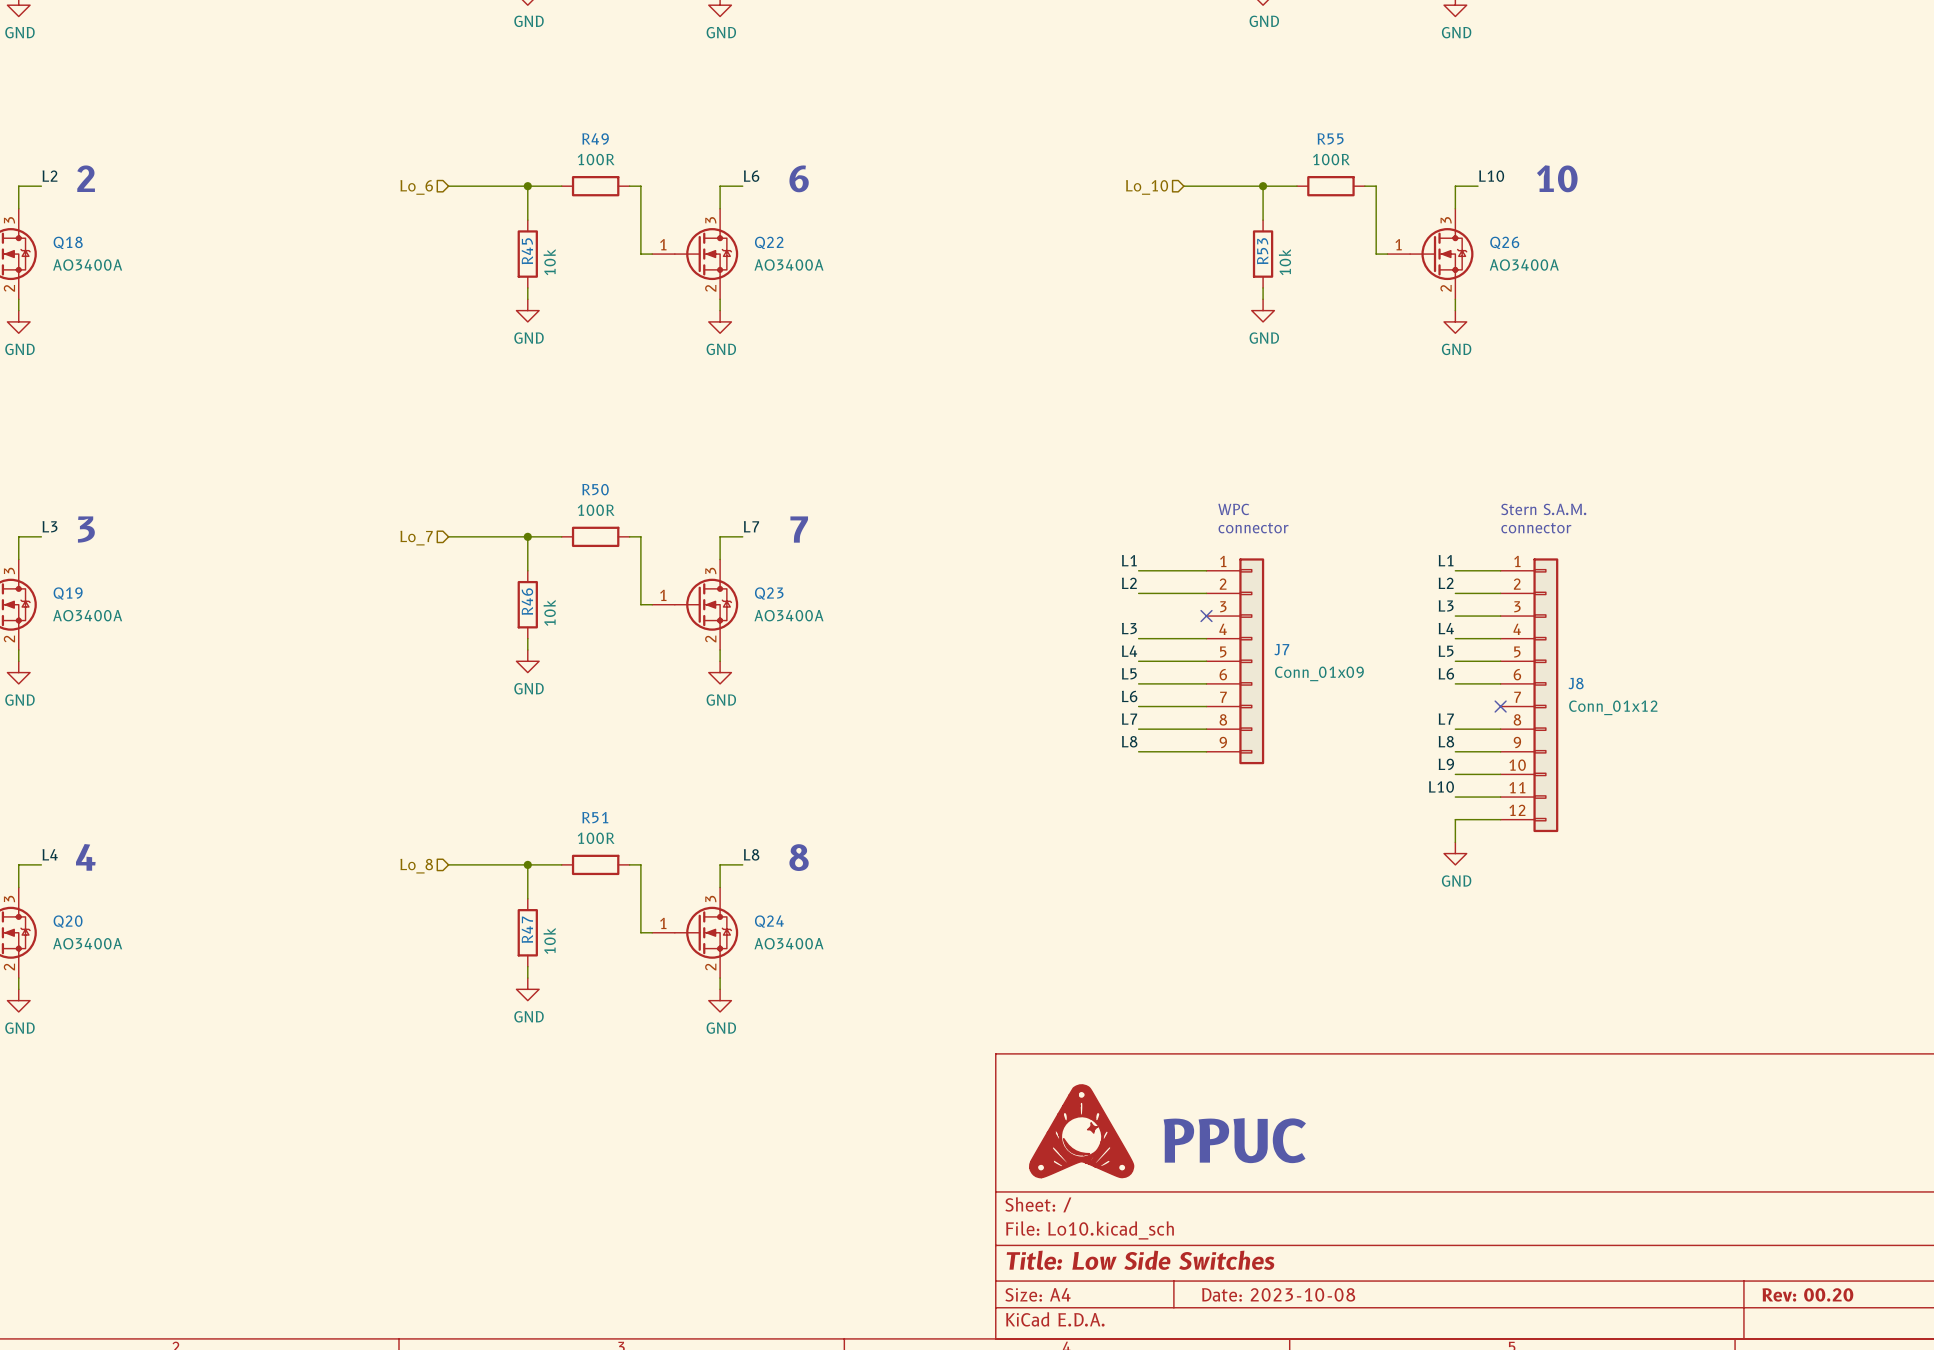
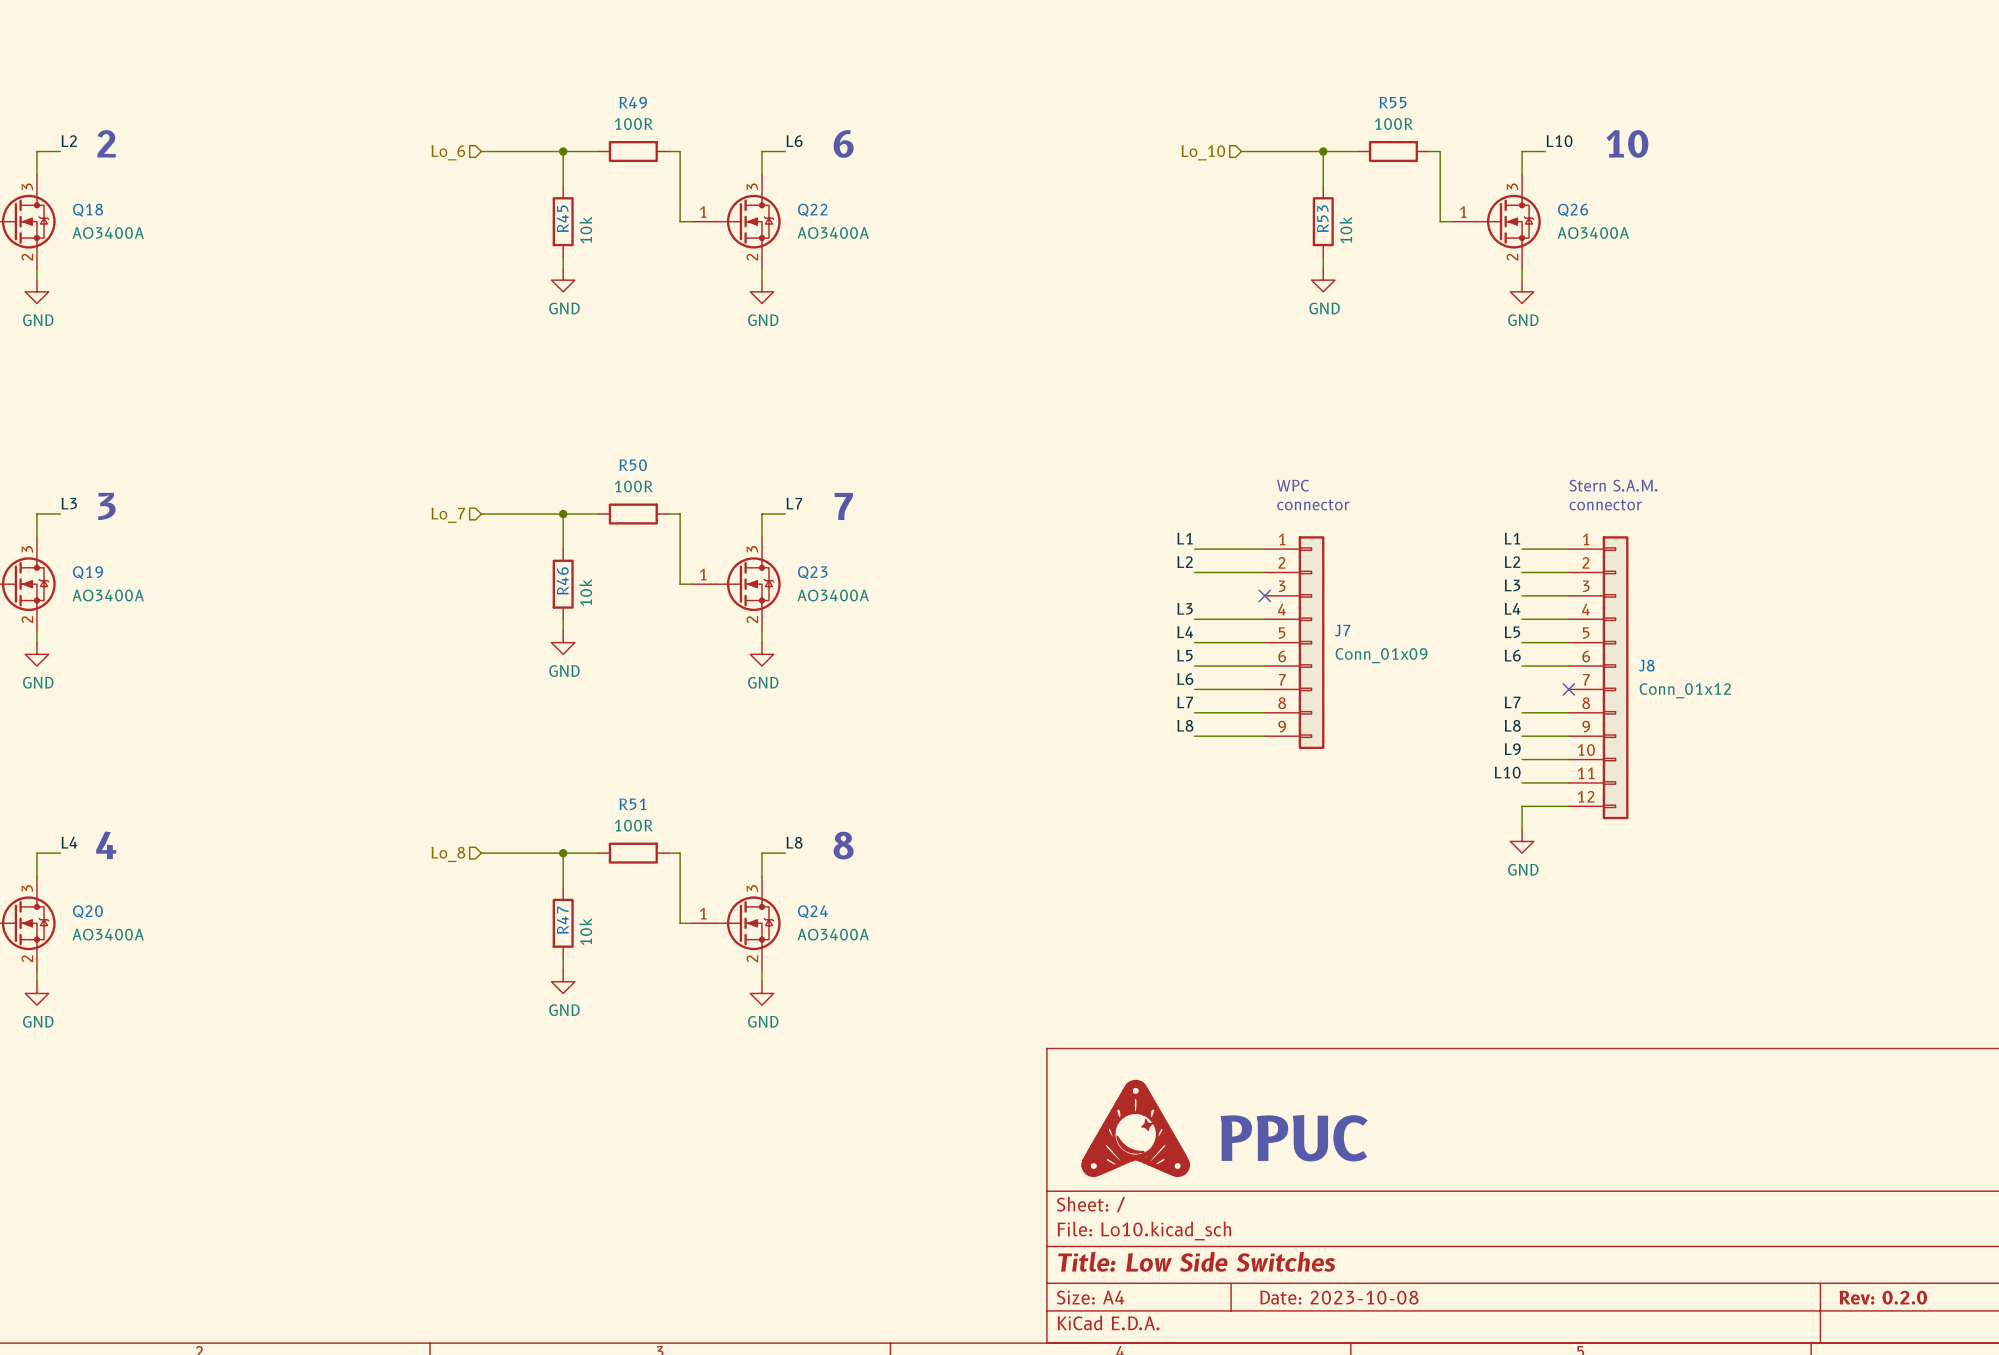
title block: Rev: 00.20 (1807, 1294) -> Rev: 0.2.0 (1883, 1297)

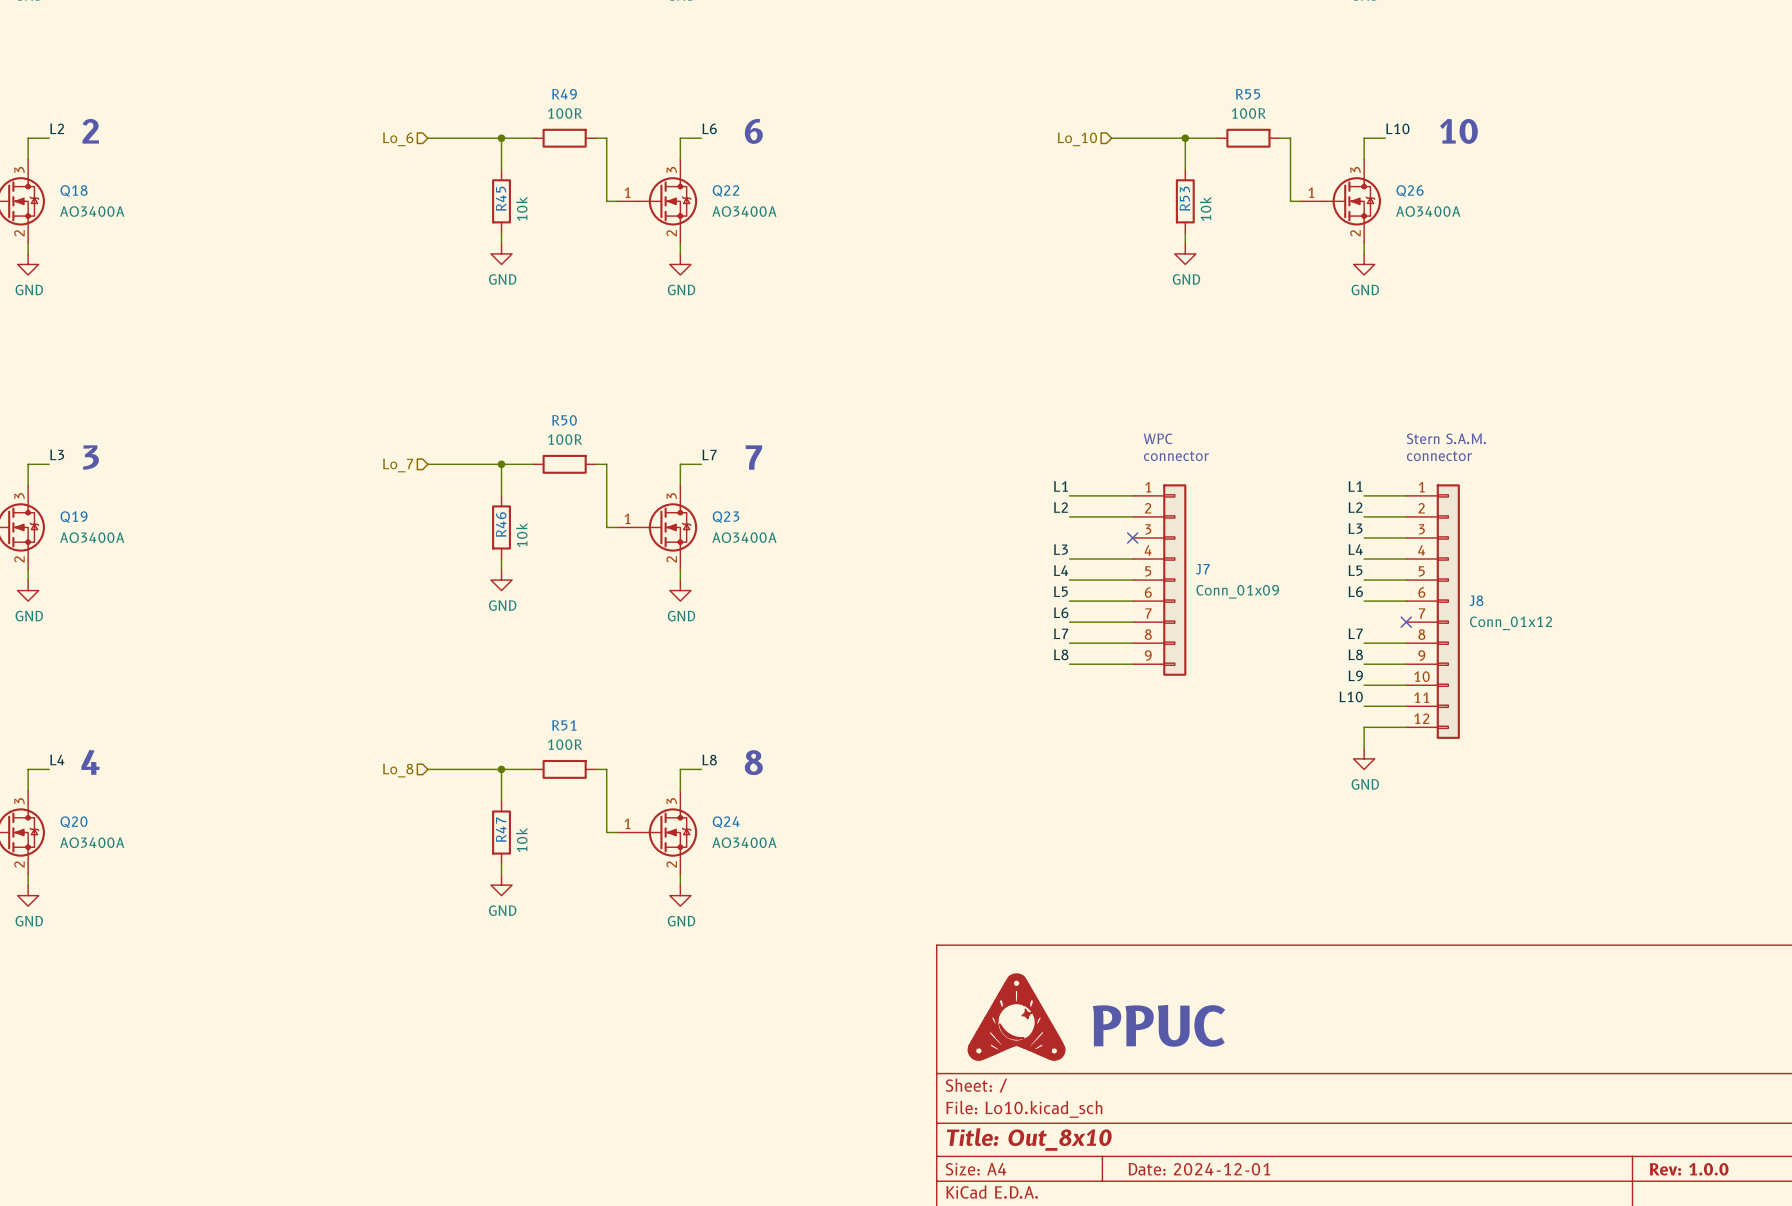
title block: Title: Low Side Switches (1196, 1261) -> Title: Out_8x10 (1029, 1139)
title block: Date: 2023-10-08 (1339, 1297) -> Date: 2024-12-01 (1199, 1169)
title block: Rev: 0.2.0 (1883, 1297) -> Rev: 1.0.0 (1689, 1169)

